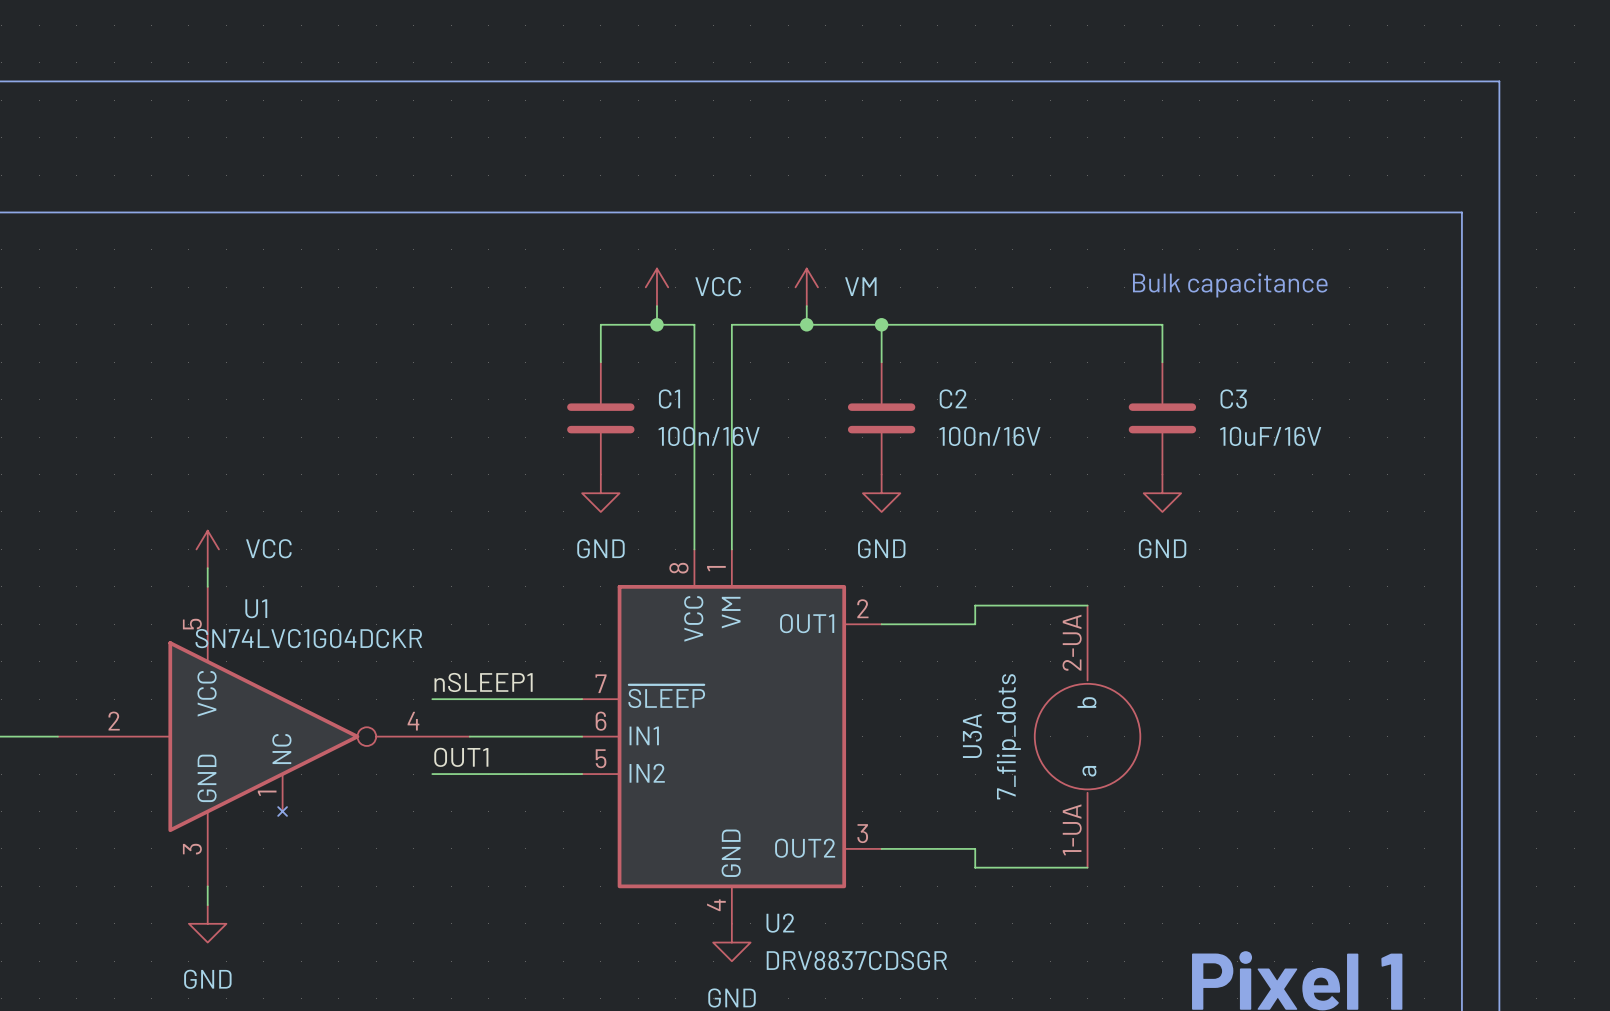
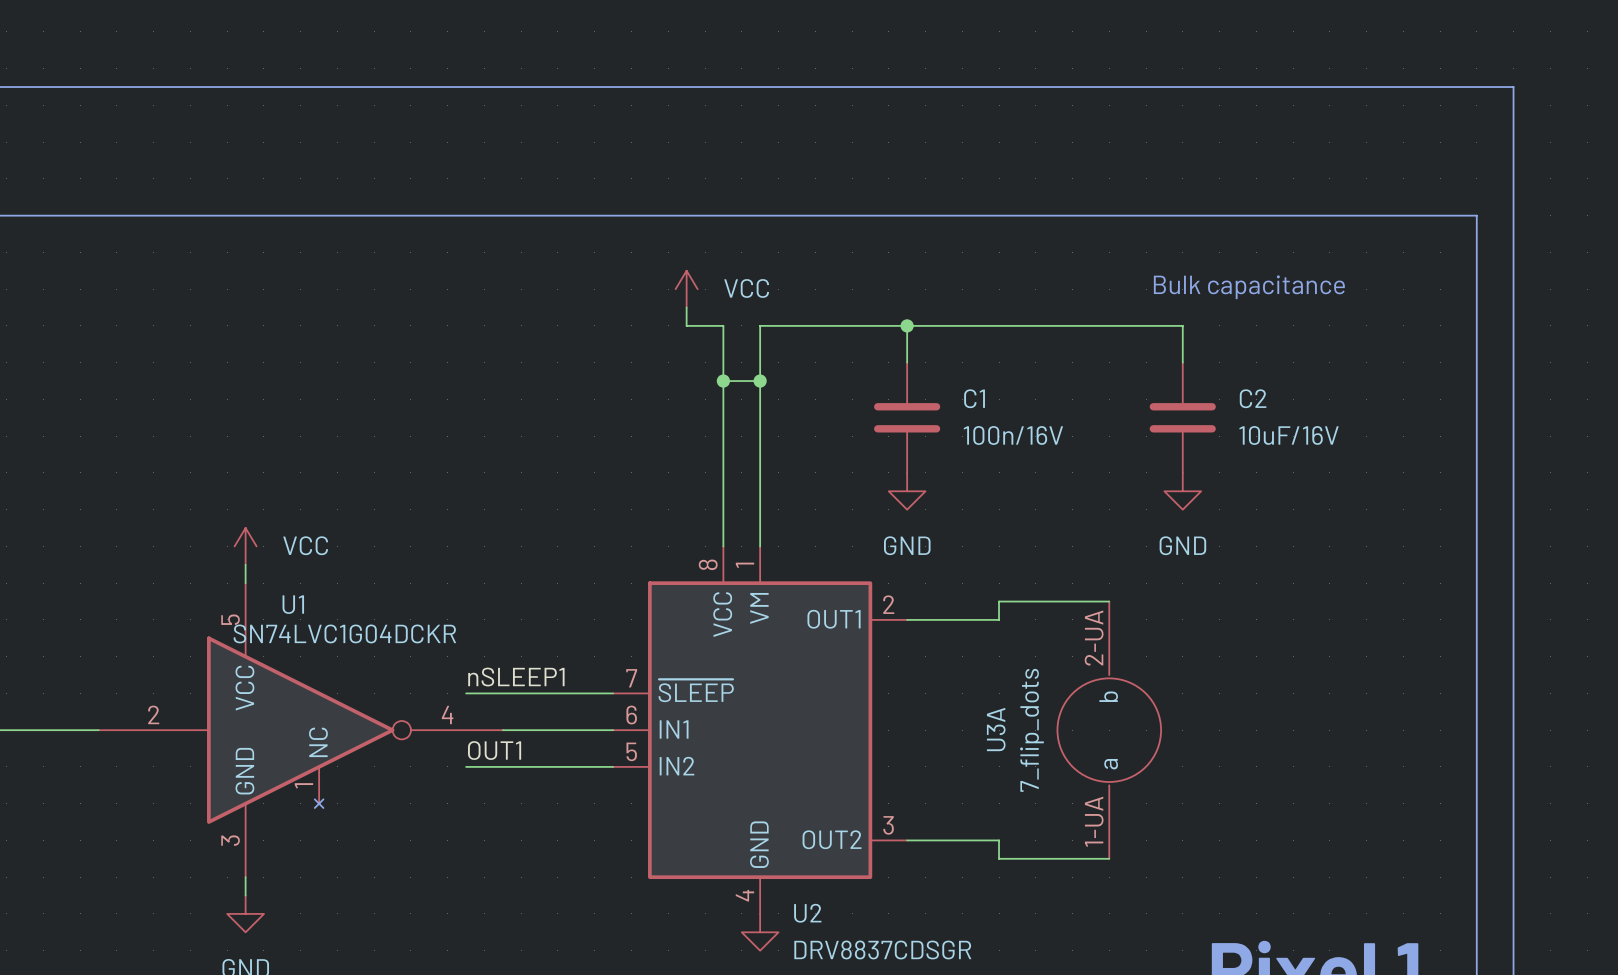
power symbol: VM (806, 287) -> none
wire: (806, 306) (806, 324) -> none
wire: (656, 324) (600, 324) (600, 362) -> none
junction: (656, 324) -> none
junction: (806, 324) -> none
wire: none -> (723, 381) (760, 381)
junction: none -> (723, 381)
junction: none -> (760, 381)
C2 name: C2 (953, 398) -> C1 (974, 398)
C3 name: C3 (1233, 398) -> C2 (1253, 398)
C1: 100n/16V (600, 418) -> none
power symbol: GND (600, 493) -> none

